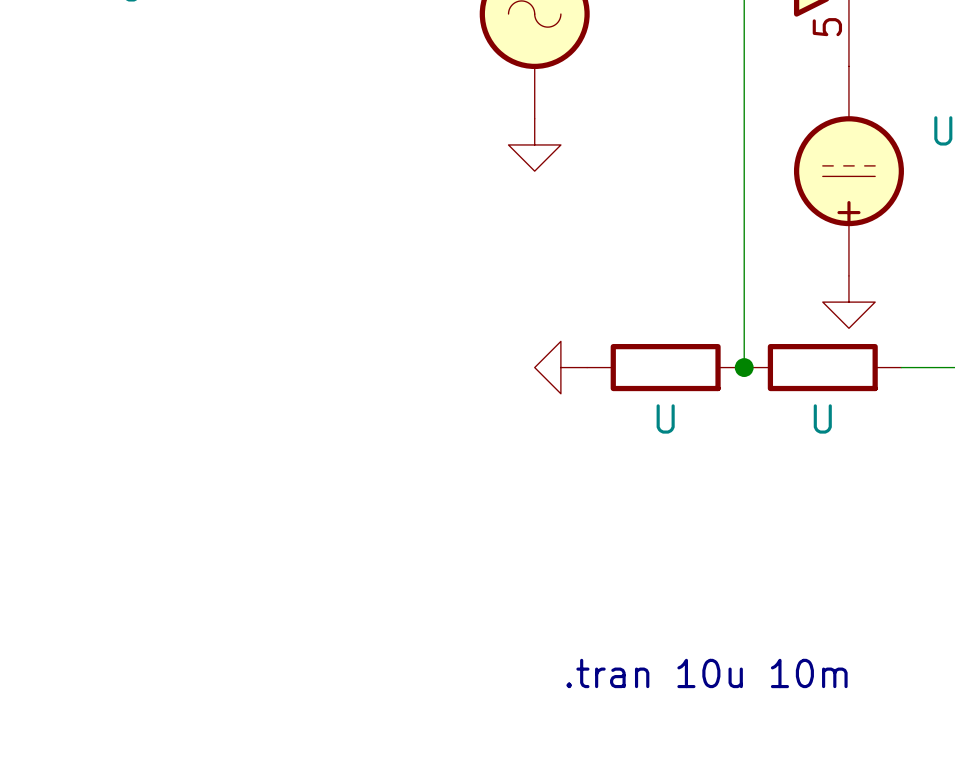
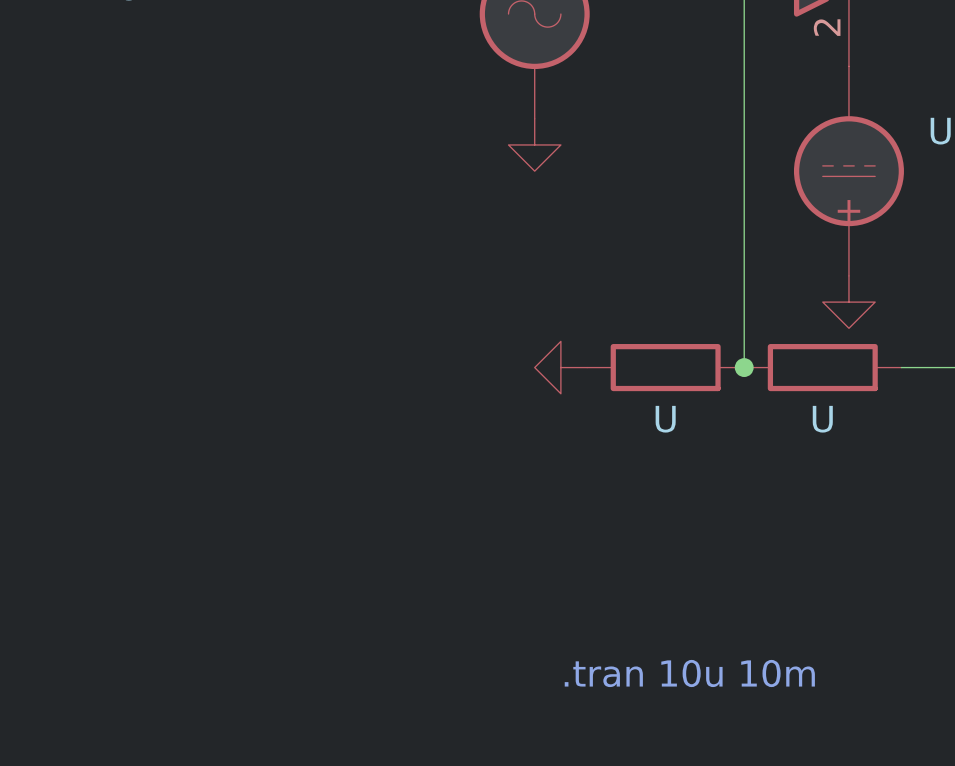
part pin number: 5 (827, 27) -> 2 (827, 27)

